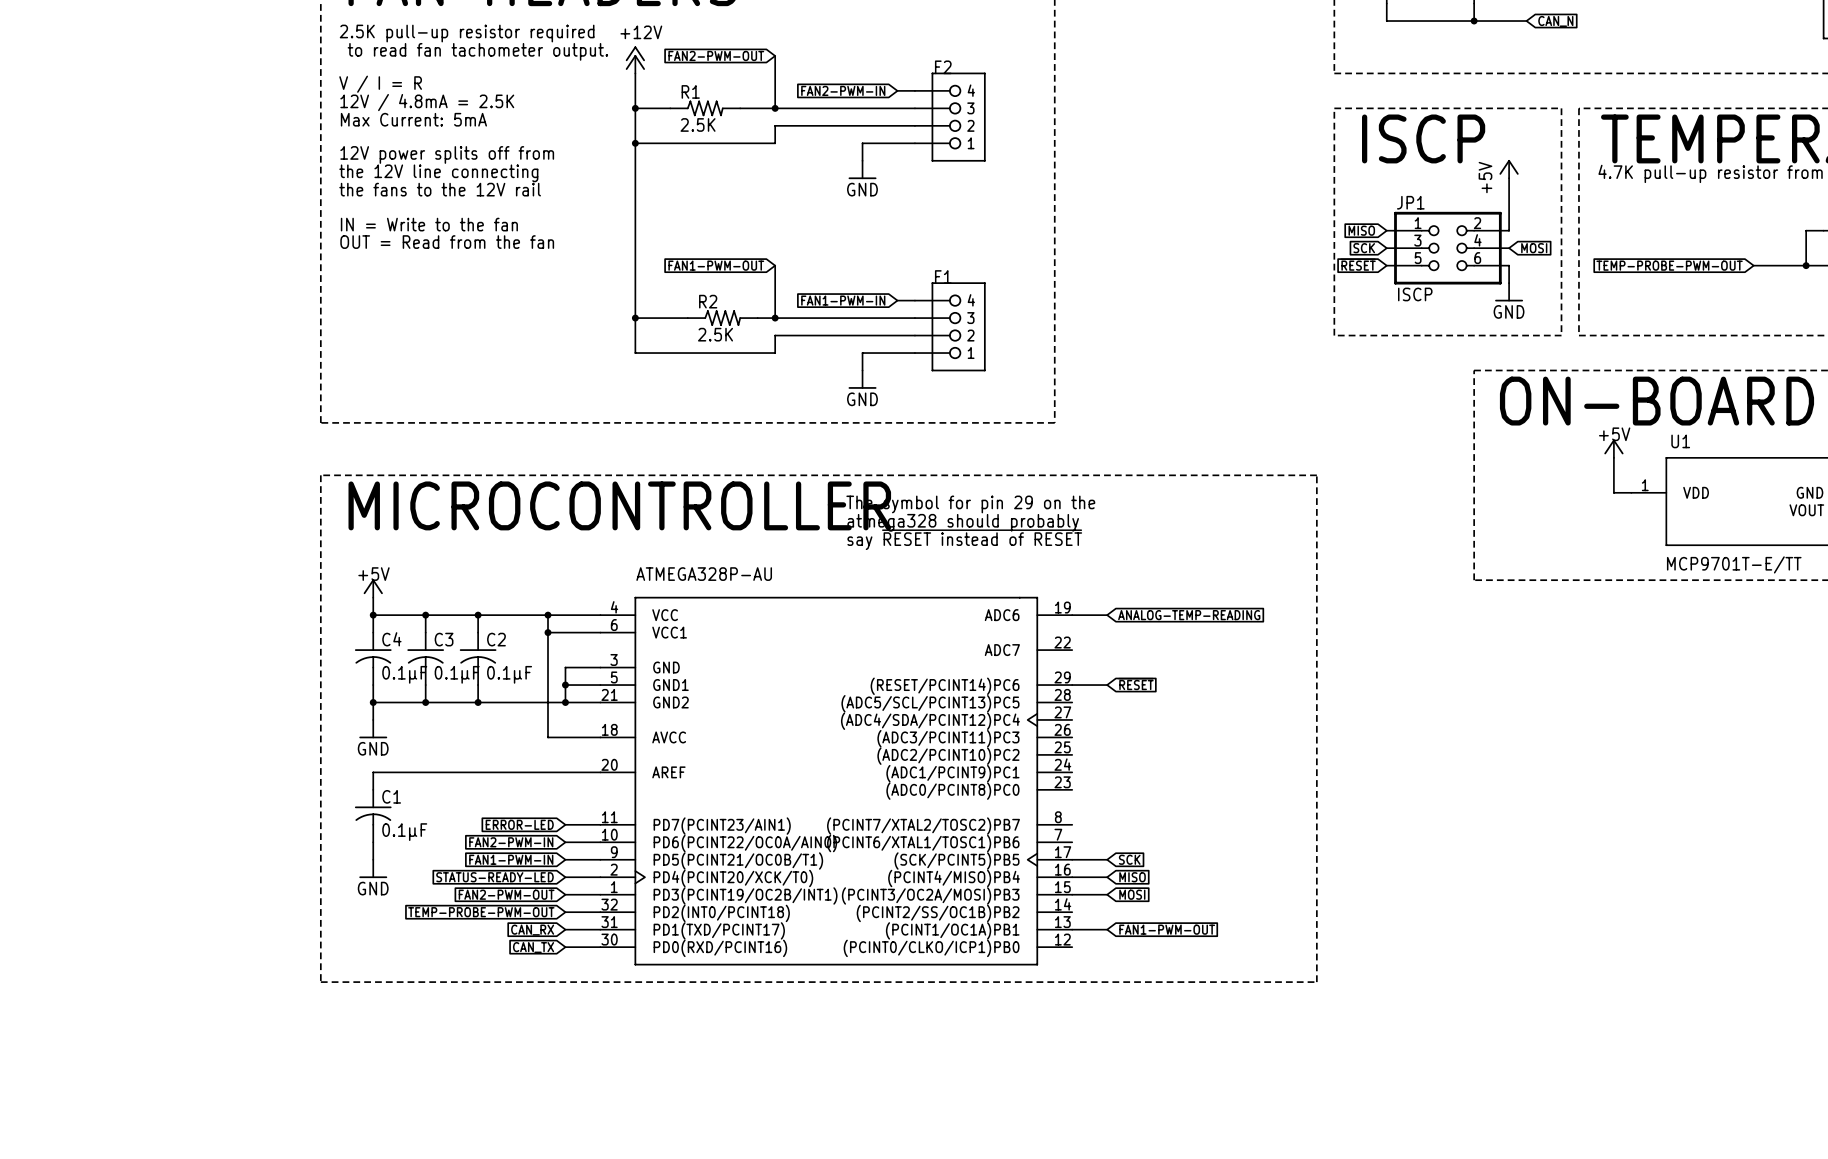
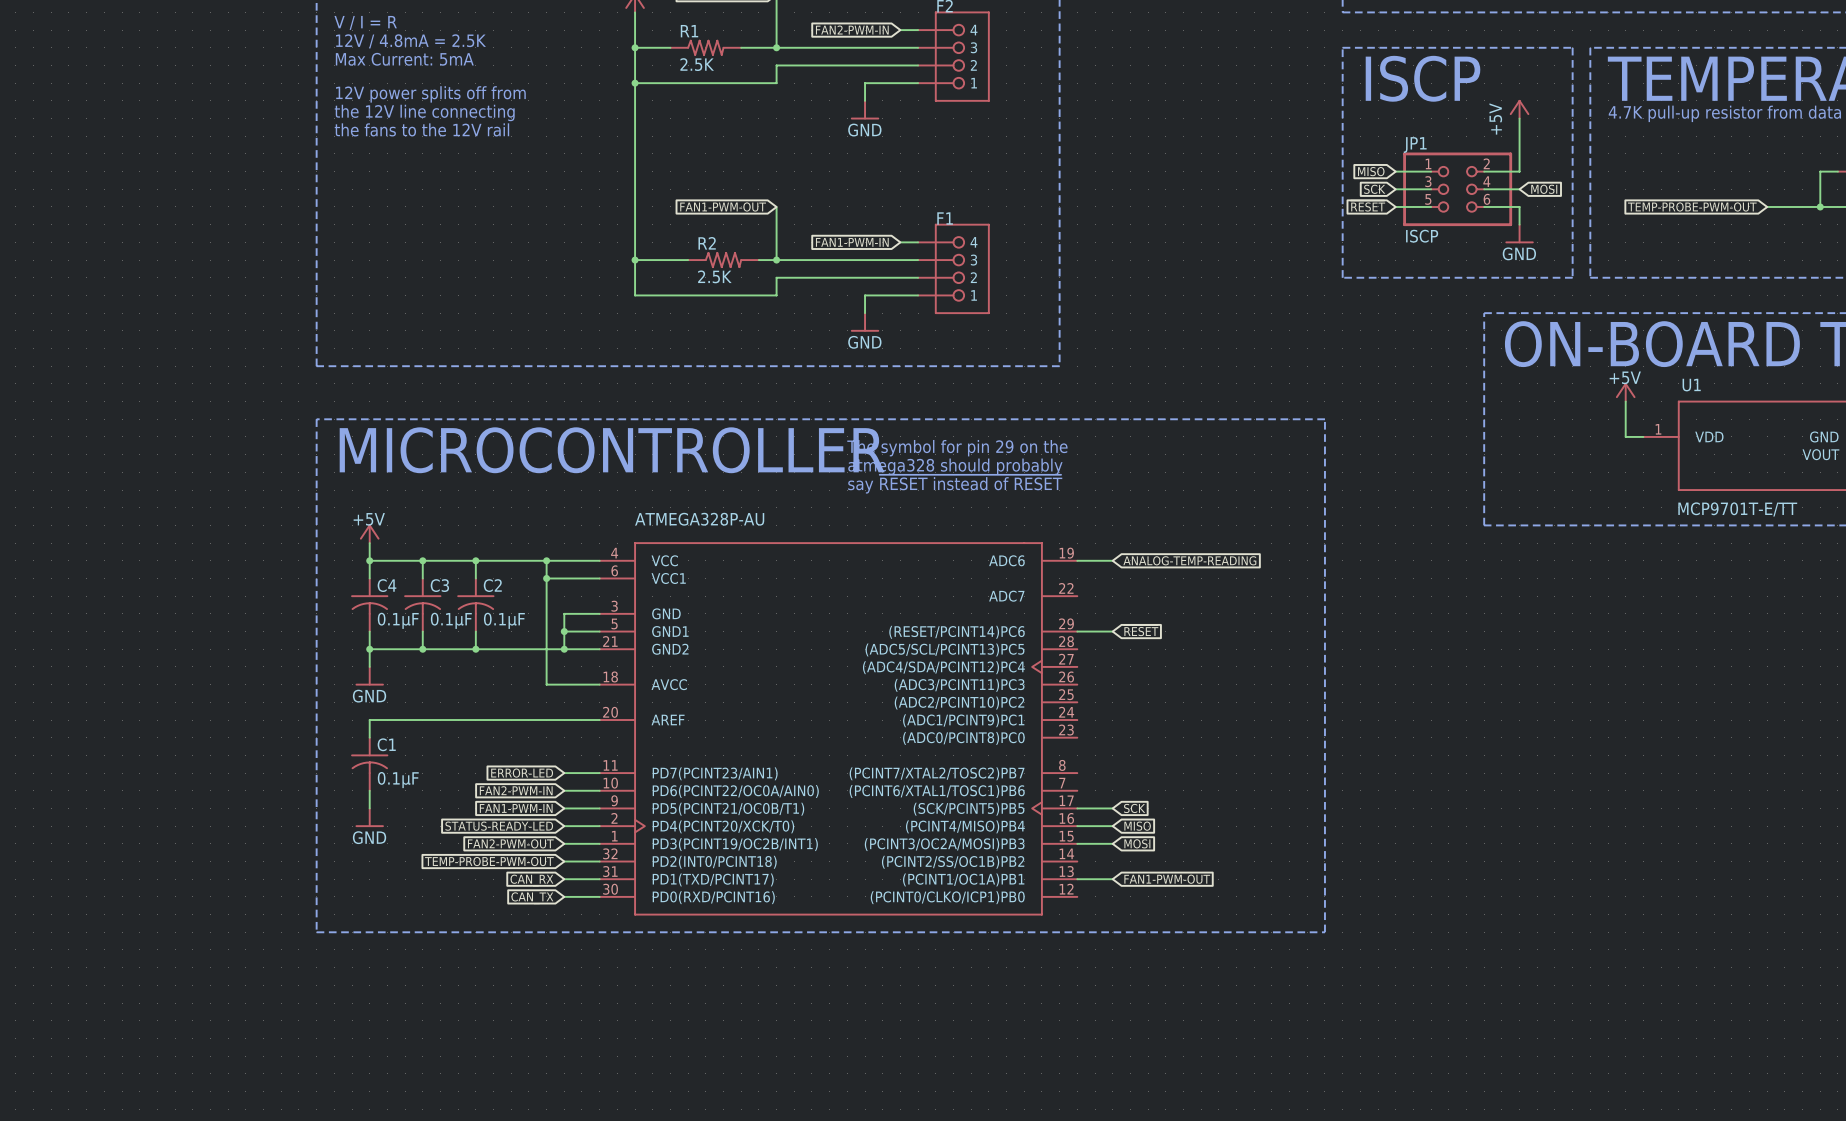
text: IN = Write to the fan (429, 224) -> none
text: OUT = Read from the fan (447, 242) -> none

